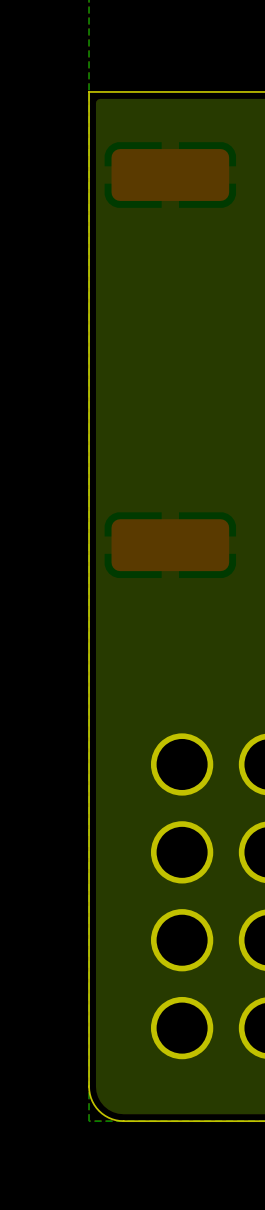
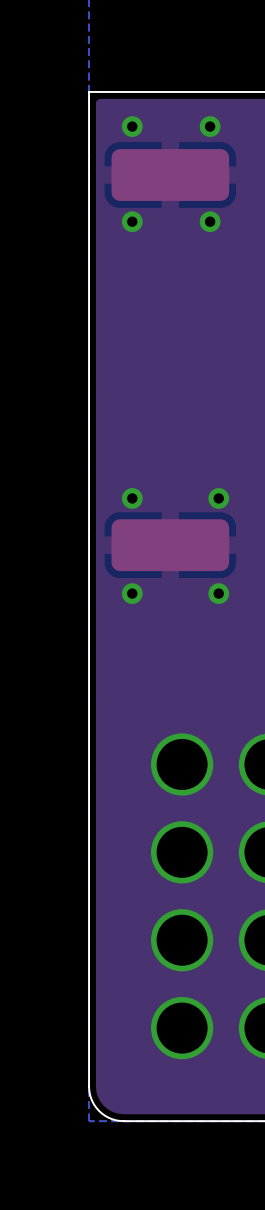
via: none -> (132, 126)
via: none -> (210, 126)
via: none -> (132, 221)
via: none -> (210, 221)
via: none -> (132, 498)
via: none -> (218, 498)
via: none -> (132, 593)
via: none -> (218, 593)

